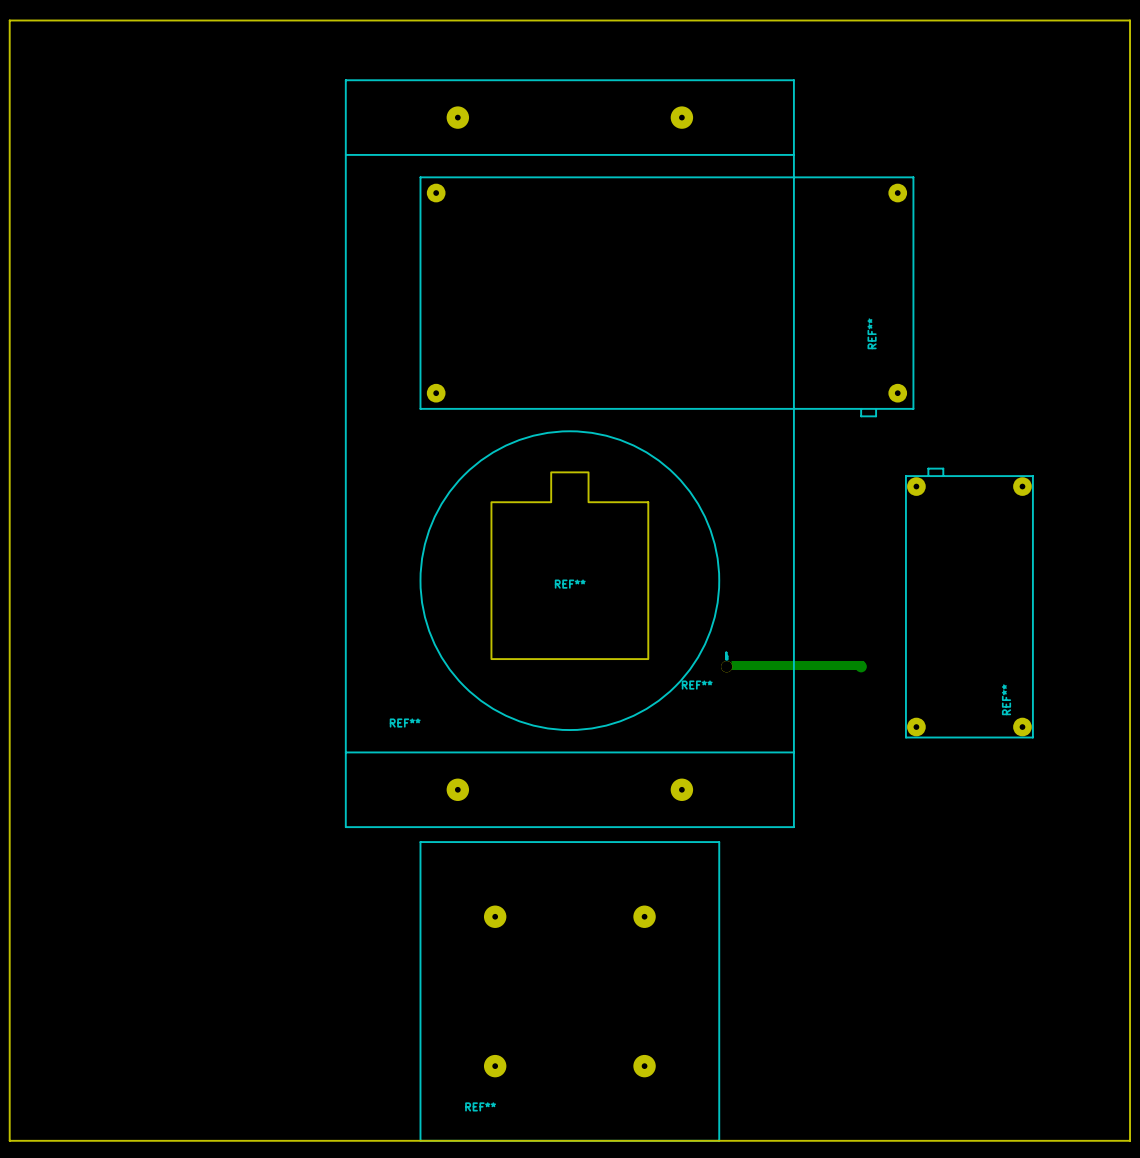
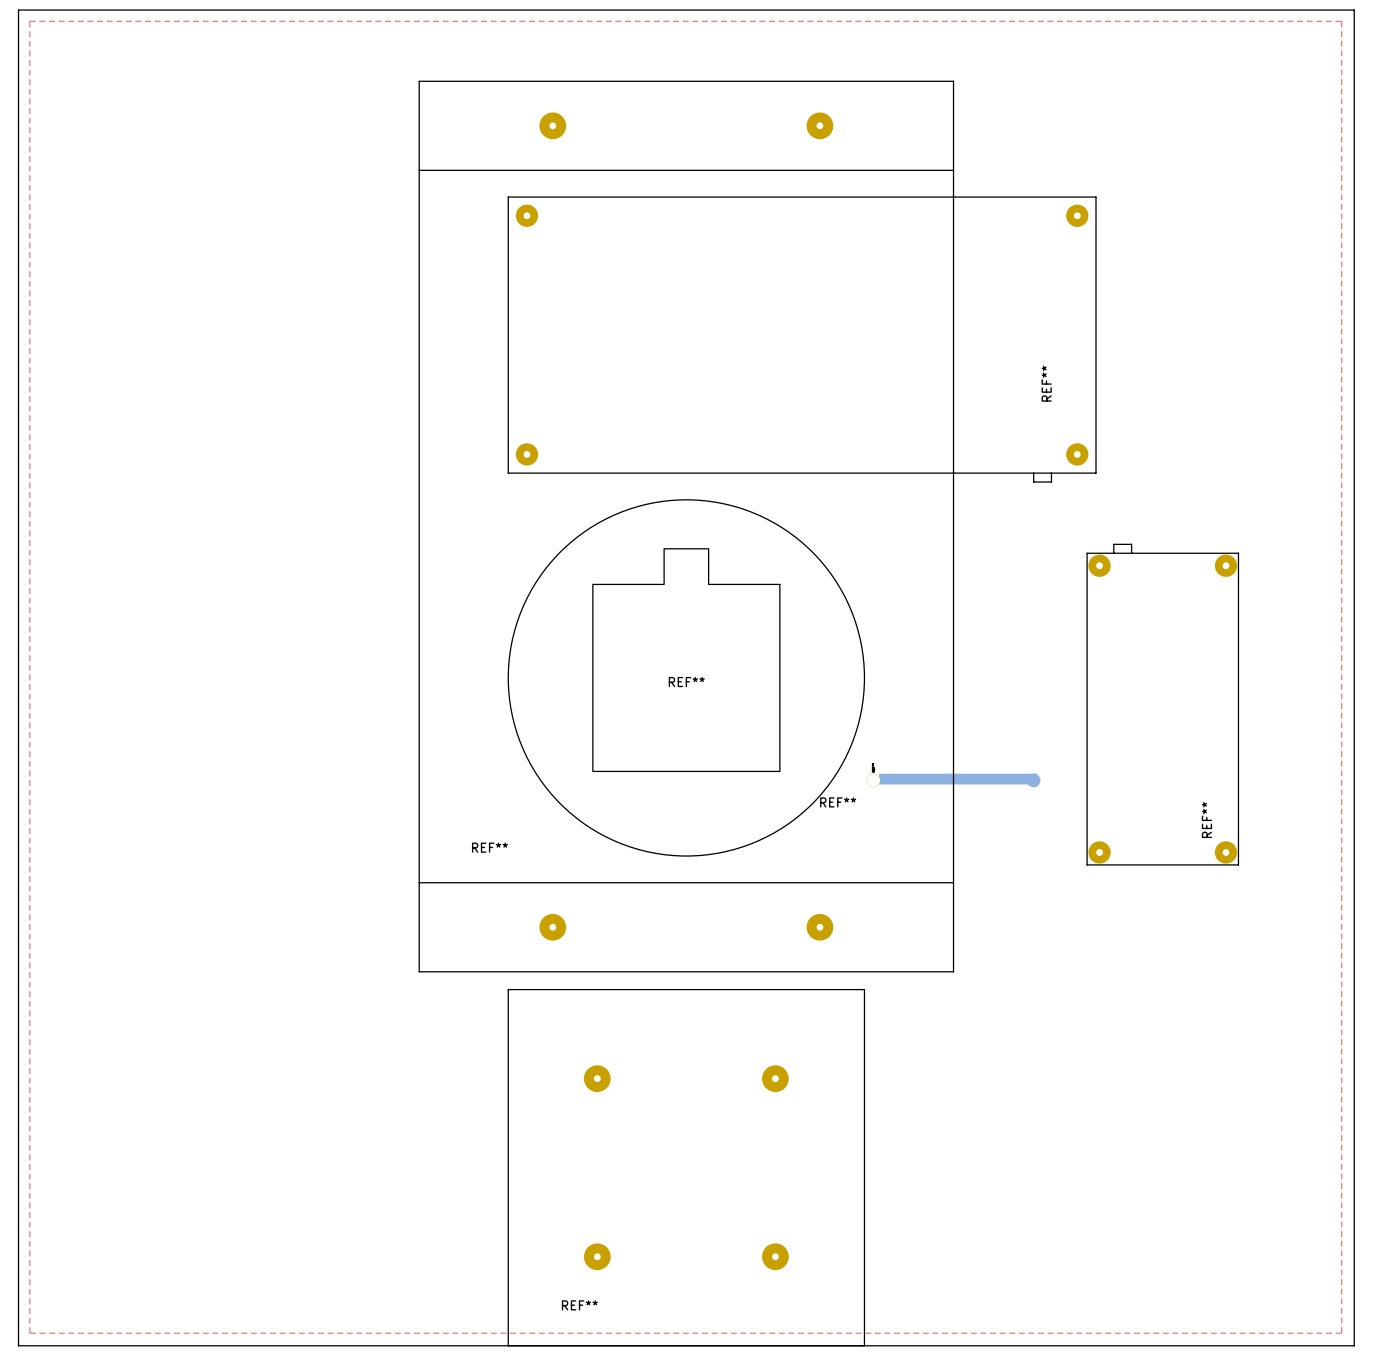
top zone outline: none -> (29, 21) (29, 1333) (1341, 1333) (1341, 21) (29, 21)

